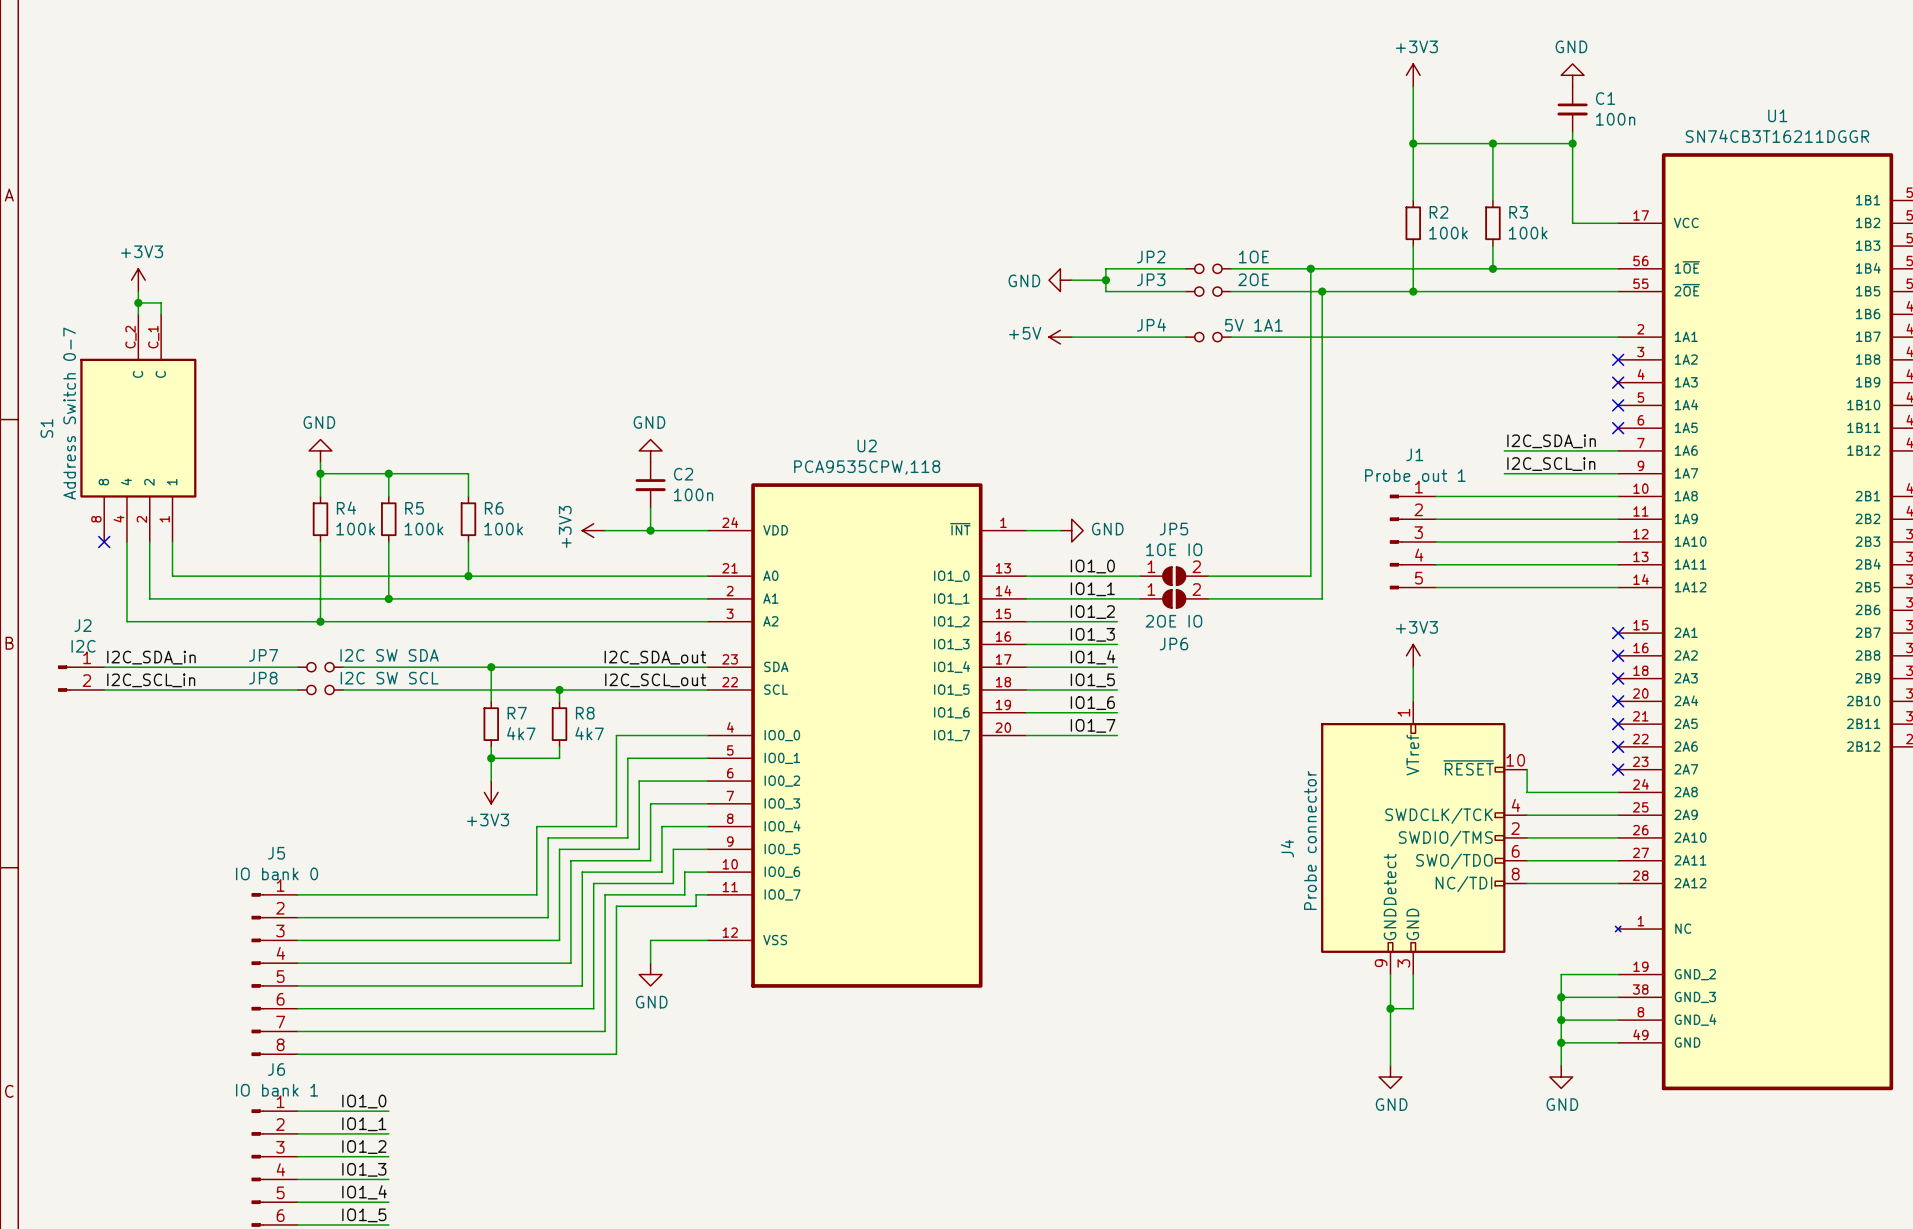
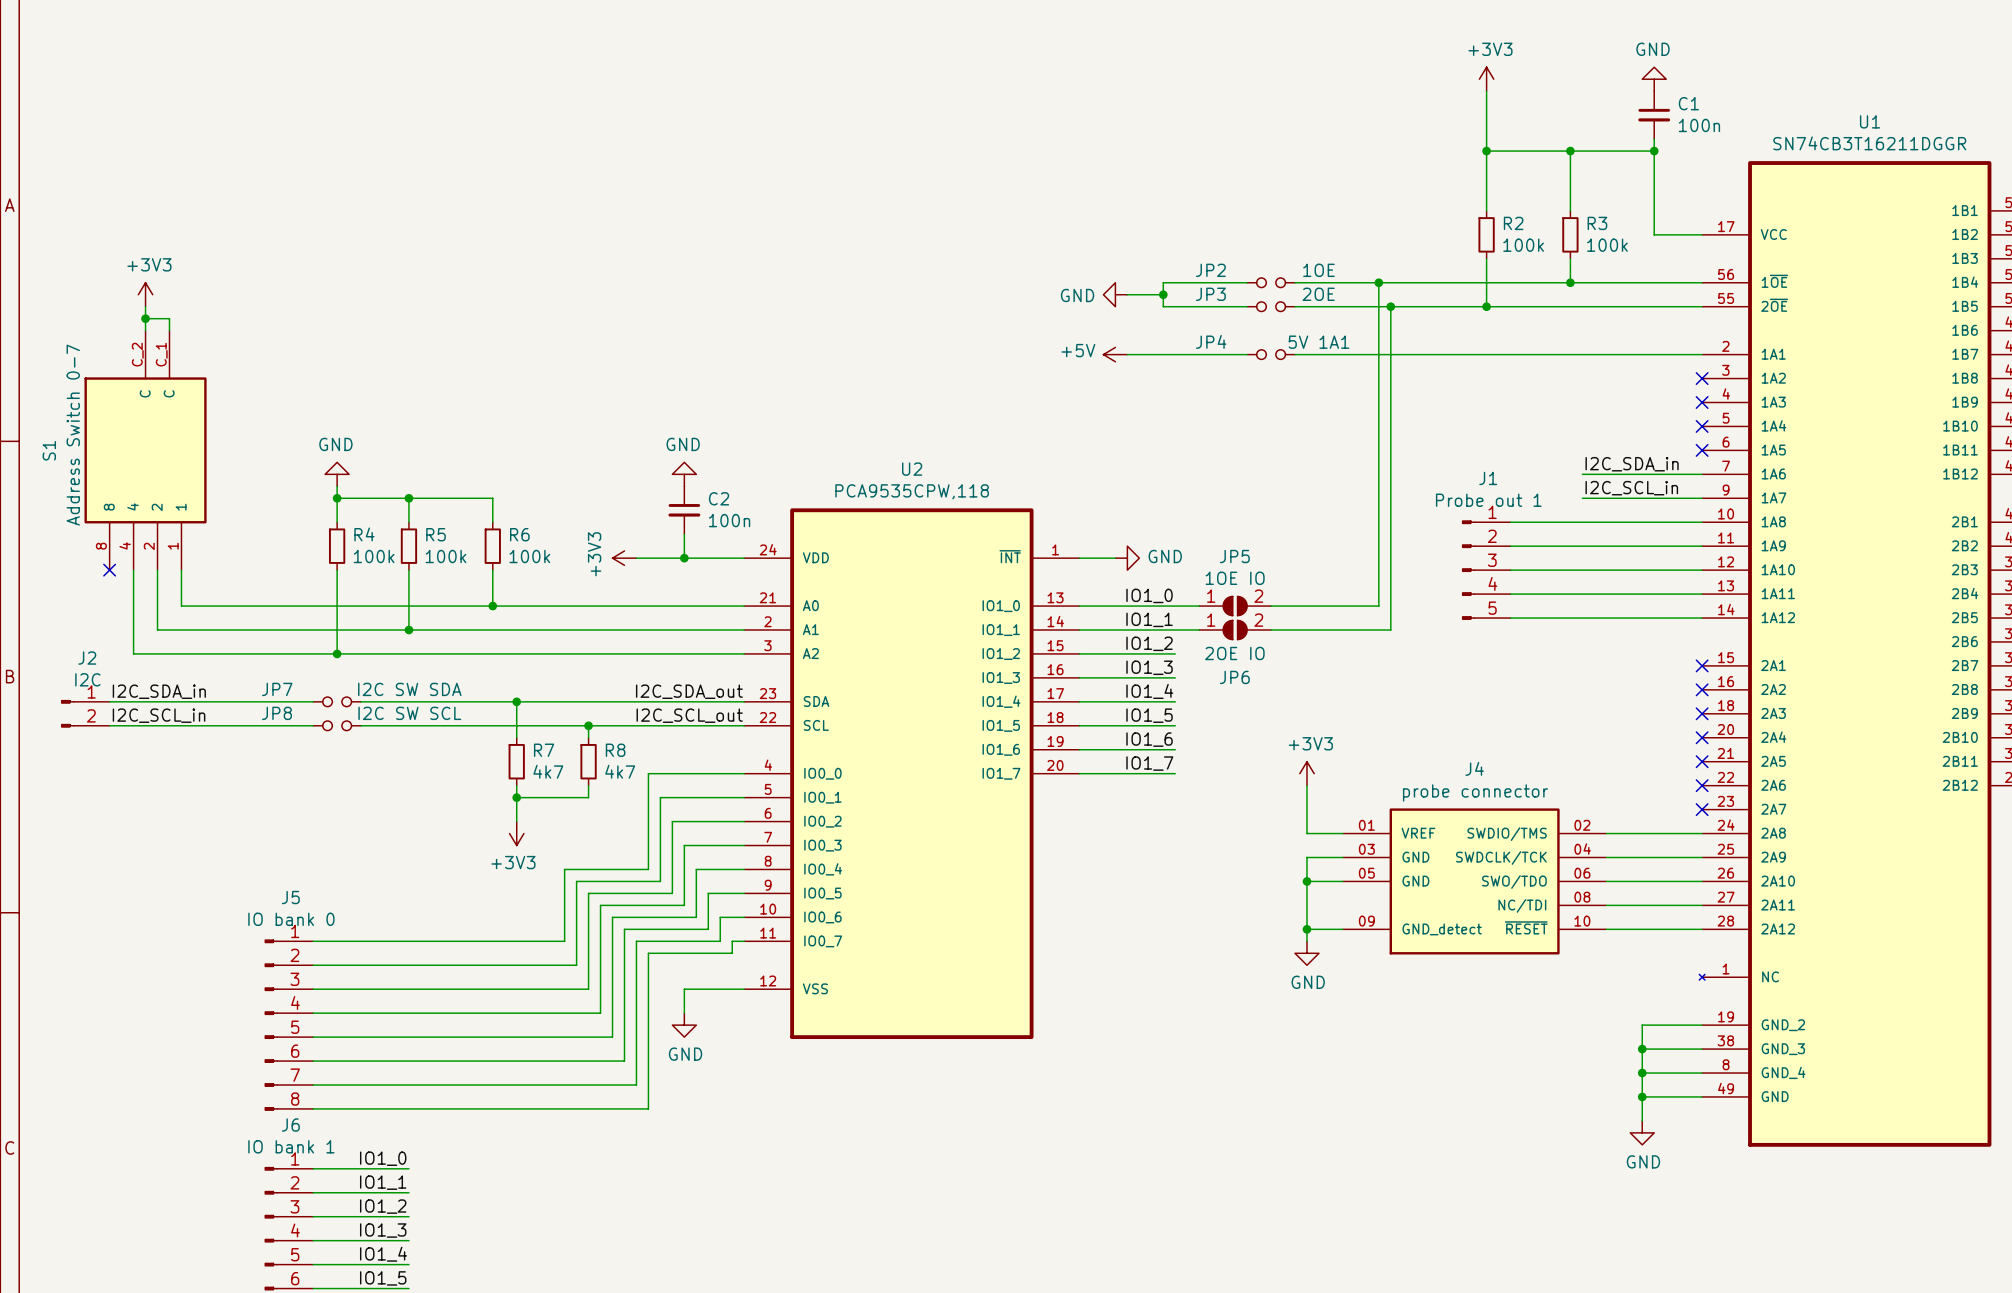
power symbol position: +3V3 (1413, 655) -> +3V3 (1306, 773)
wire: (1413, 667) (1413, 701) -> none
J4 symbol: [1321, 701, 1528, 975] -> [1342, 808, 1607, 955]
wire: none -> (1306, 785) (1306, 833) (1342, 833)
wire: (1527, 769) (1527, 792) -> none
wire: none -> (1342, 857) (1306, 857) (1306, 941)
wire: none -> (1306, 881) (1342, 881)
junction: none -> (1306, 881)
J4 value: Probe connector (1310, 840) -> probe connector (1475, 792)
J4 name position: J4 (1287, 848) -> J4 (1474, 768)
wire: none -> (1306, 929) (1342, 929)
junction: none -> (1306, 929)
power symbol: none -> GND (1306, 953)
wire: (1390, 974) (1390, 1065) -> none
wire: (1413, 974) (1413, 1008) (1390, 1008) -> none
junction: (1390, 1008) -> none
power symbol: GND (1390, 1077) -> none

